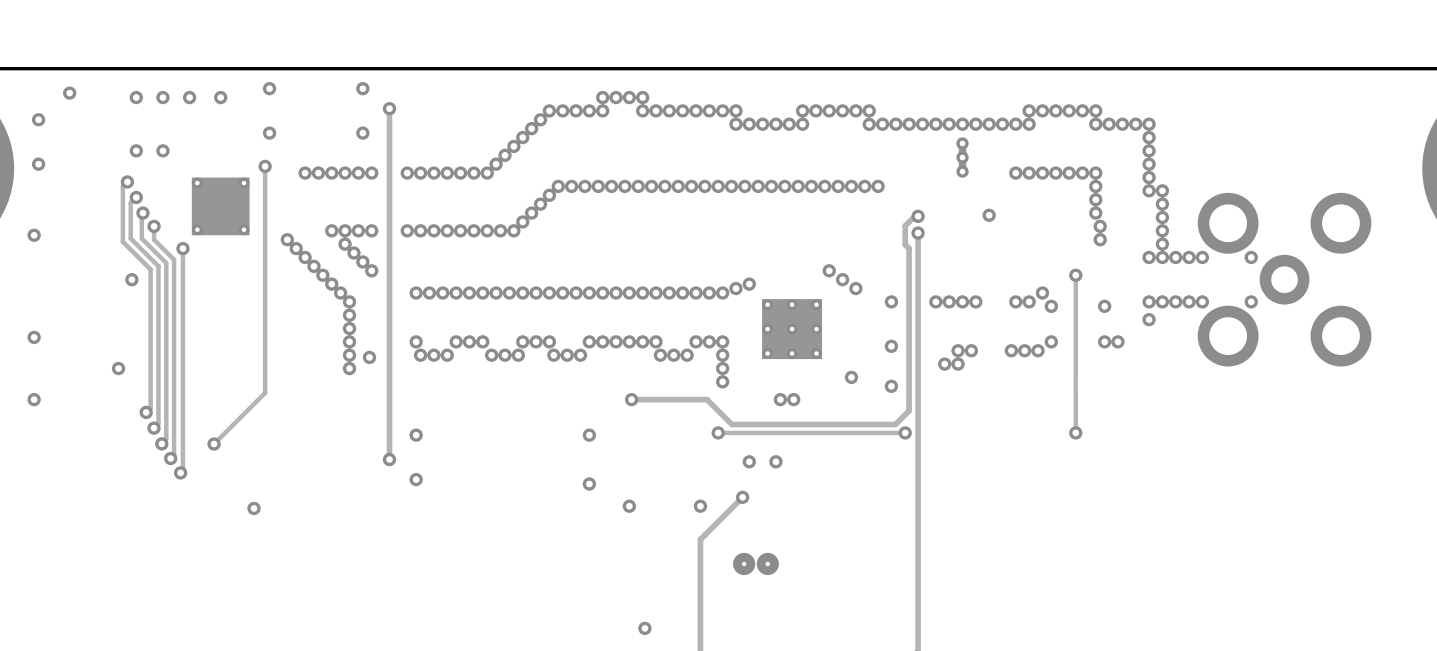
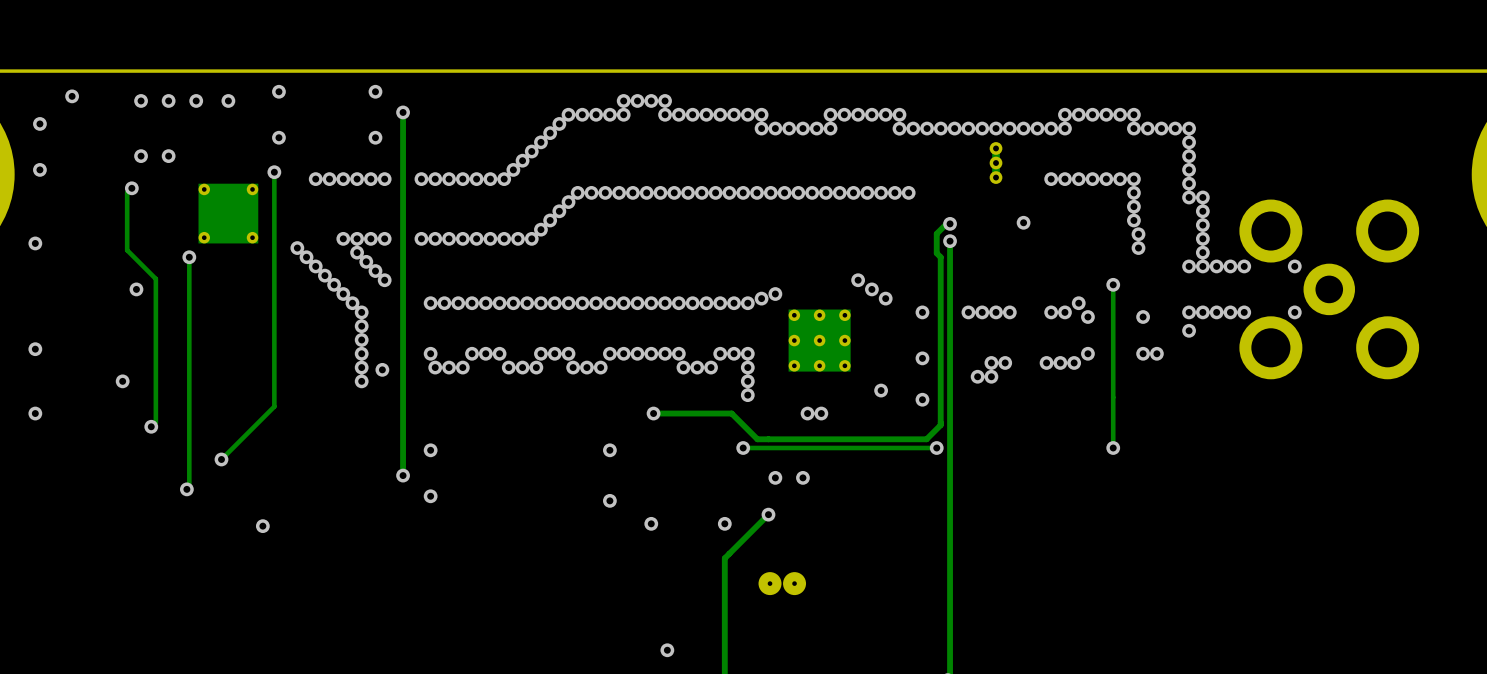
track: (136, 197) (130, 203) (130, 238) (158, 266) (158, 423) (153, 428) -> none
via: (136, 197) -> none
track: (142, 213) (141, 238) (166, 262) (166, 439) (161, 443) -> none
via: (142, 213) -> none
track: (154, 226) (154, 239) (174, 259) (174, 455) (170, 458) -> none
via: (154, 226) -> none
via: (153, 428) -> none
via: (161, 443) -> none
via: (170, 458) -> none

